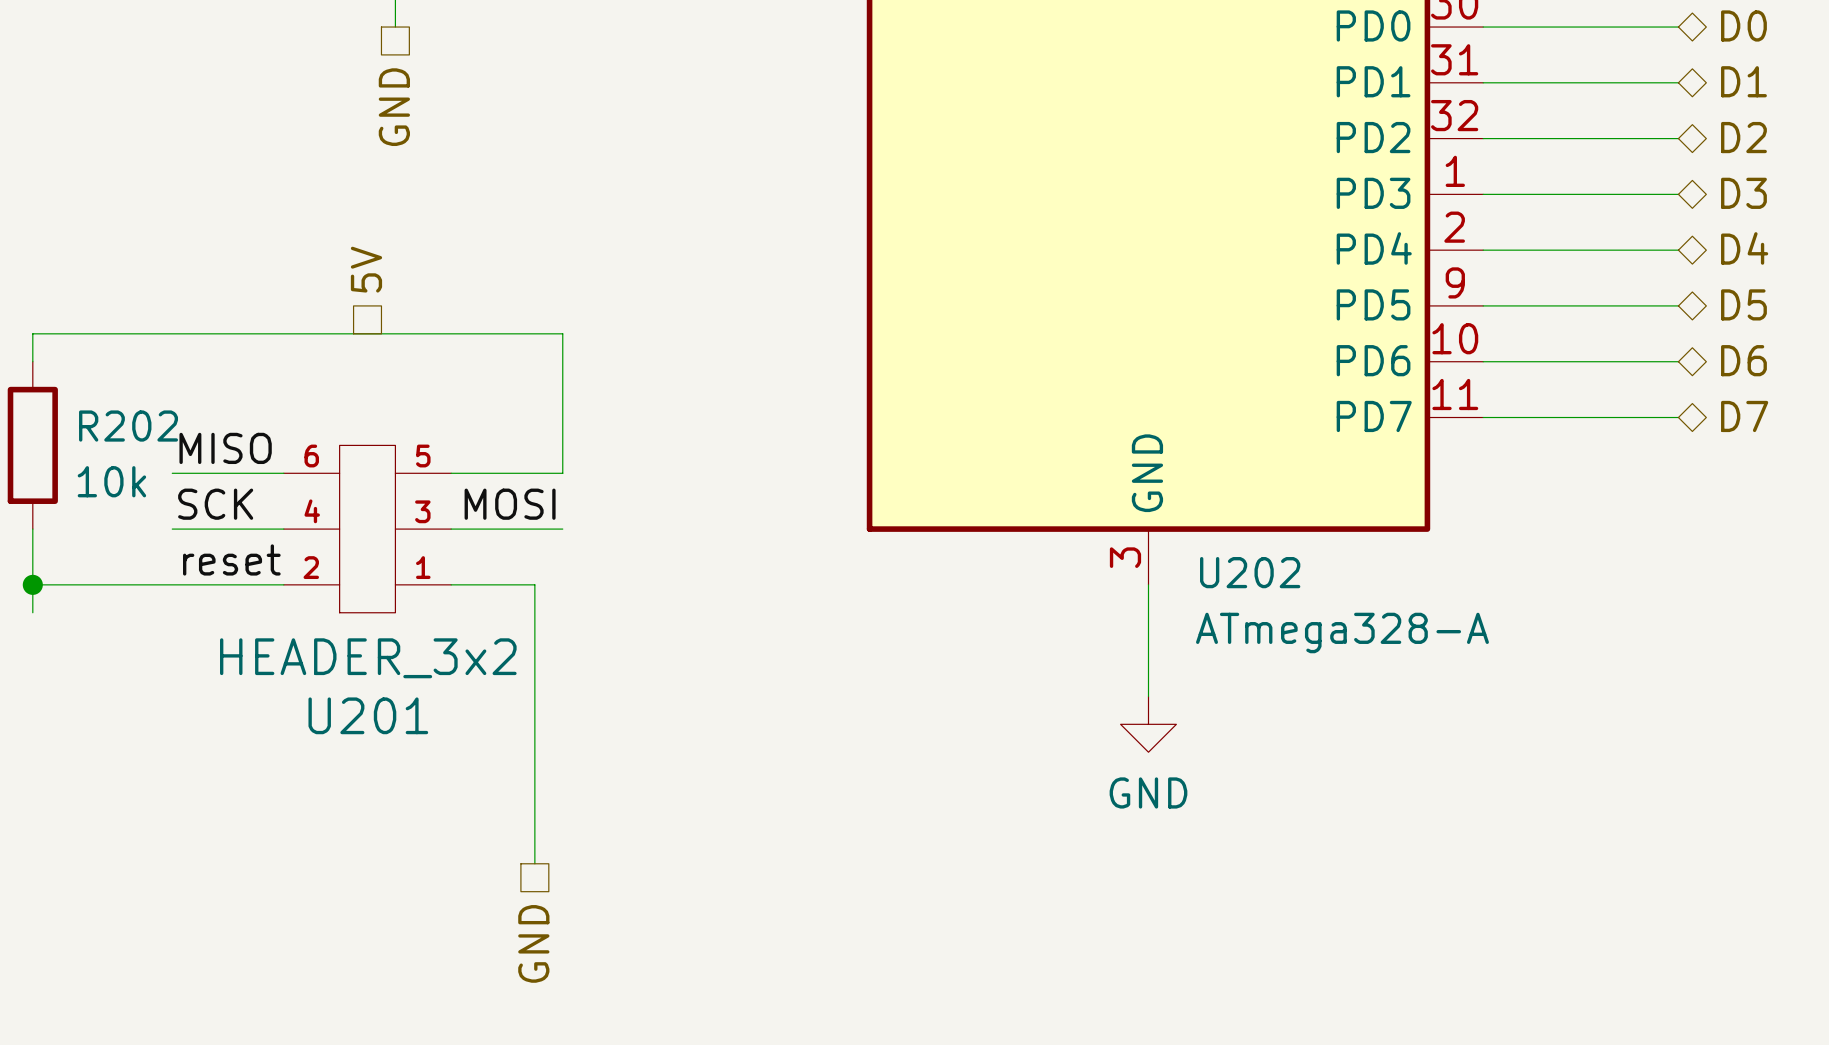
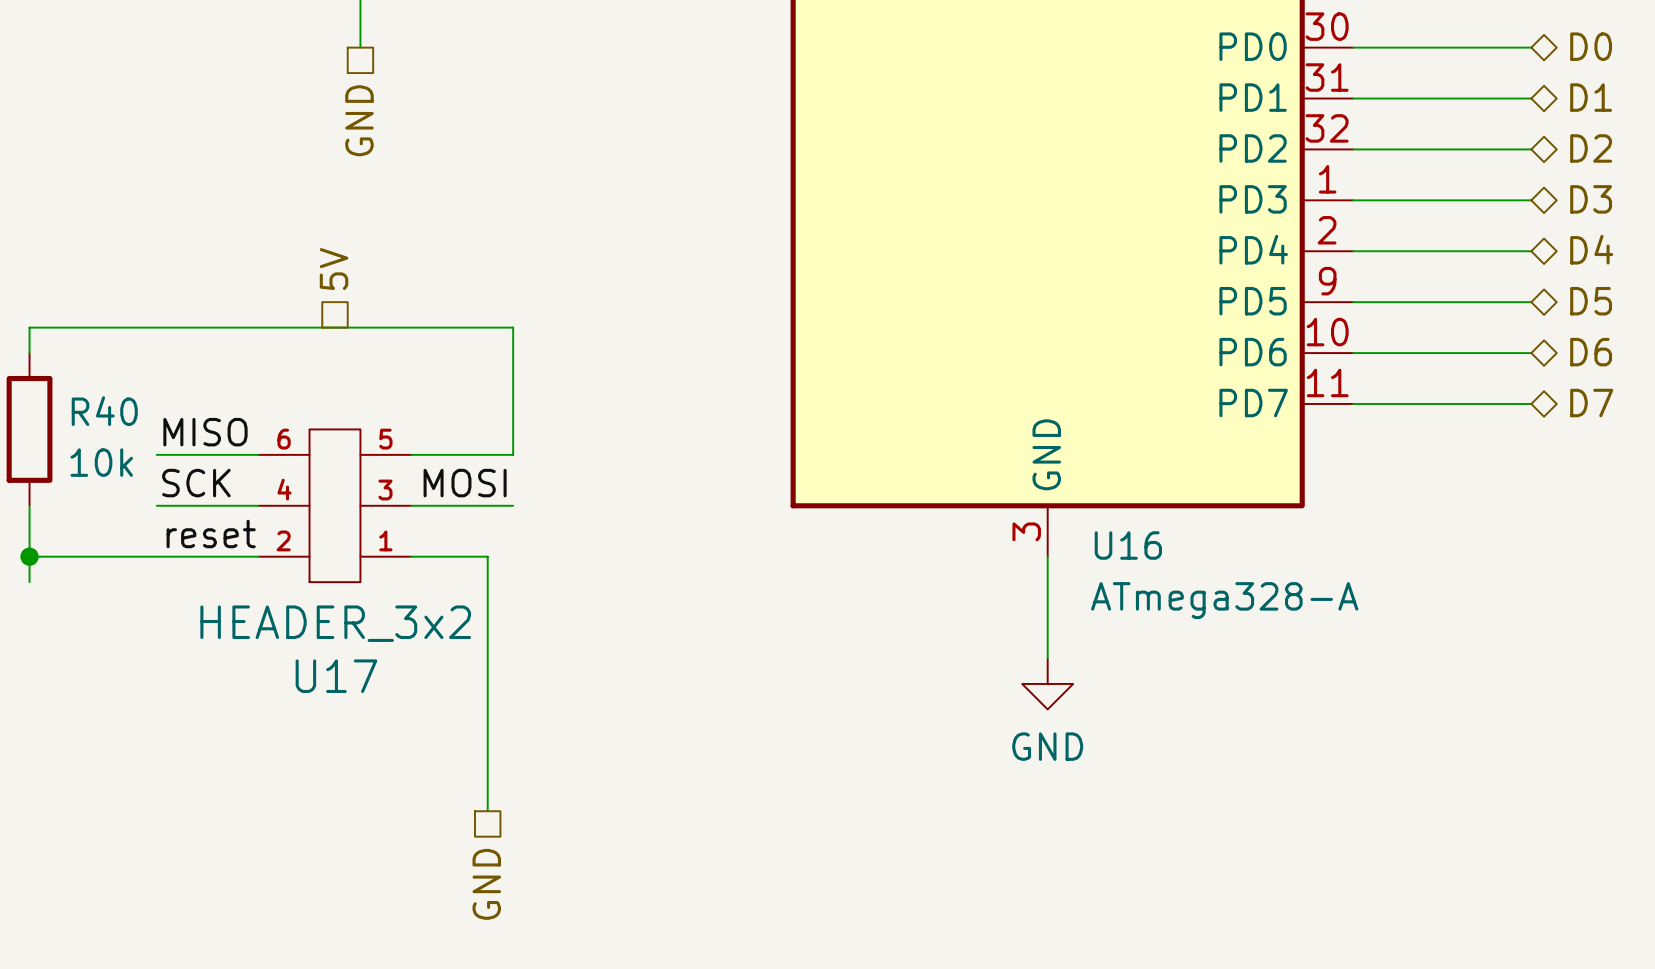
R202 name: R202 (128, 426) -> R40 (104, 411)
U202 name: U202 (1250, 572) -> U16 (1128, 545)
U201 name: U201 (368, 715) -> U17 (336, 676)

